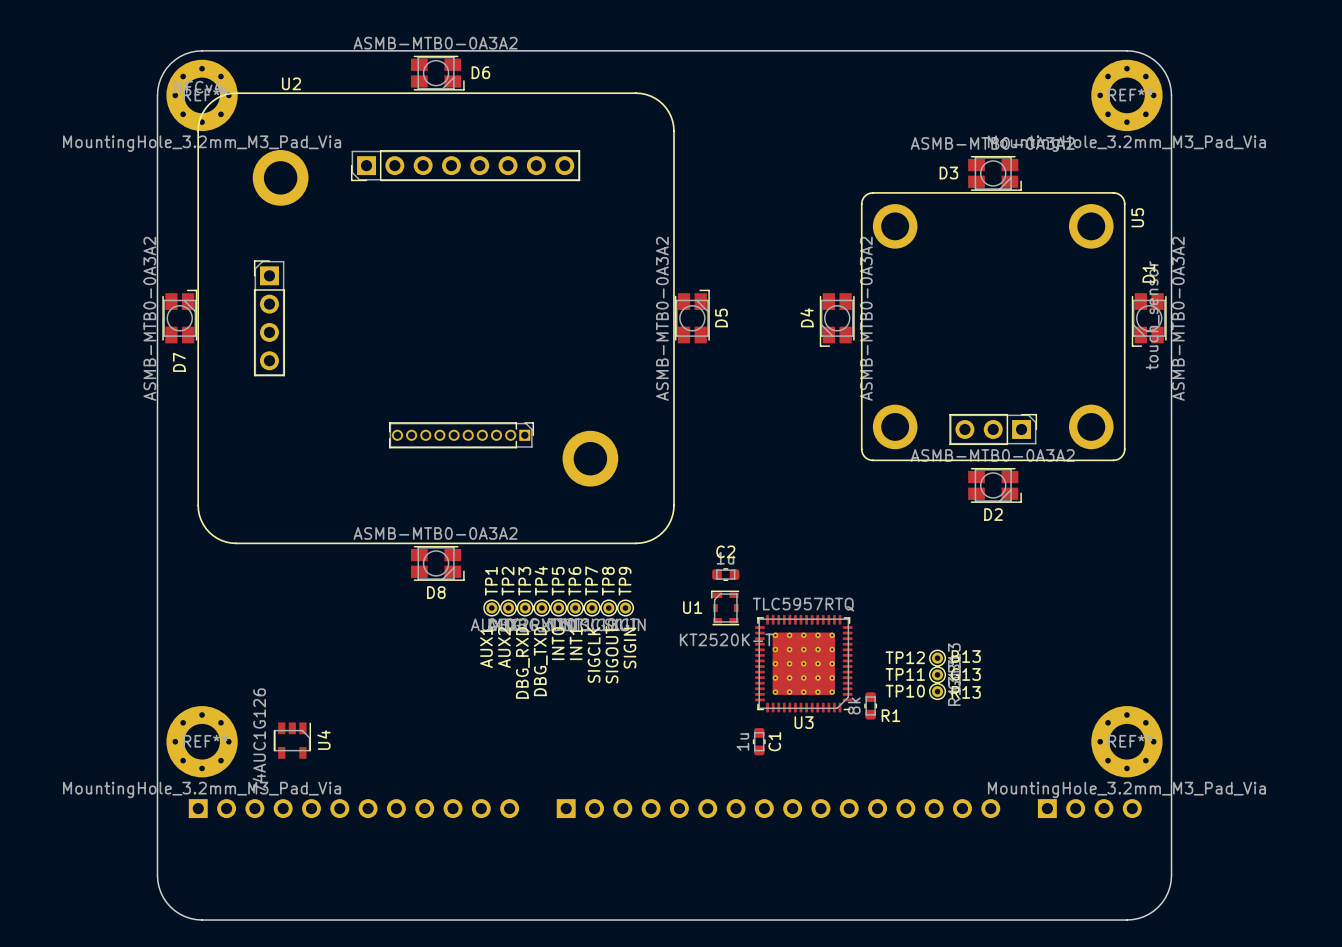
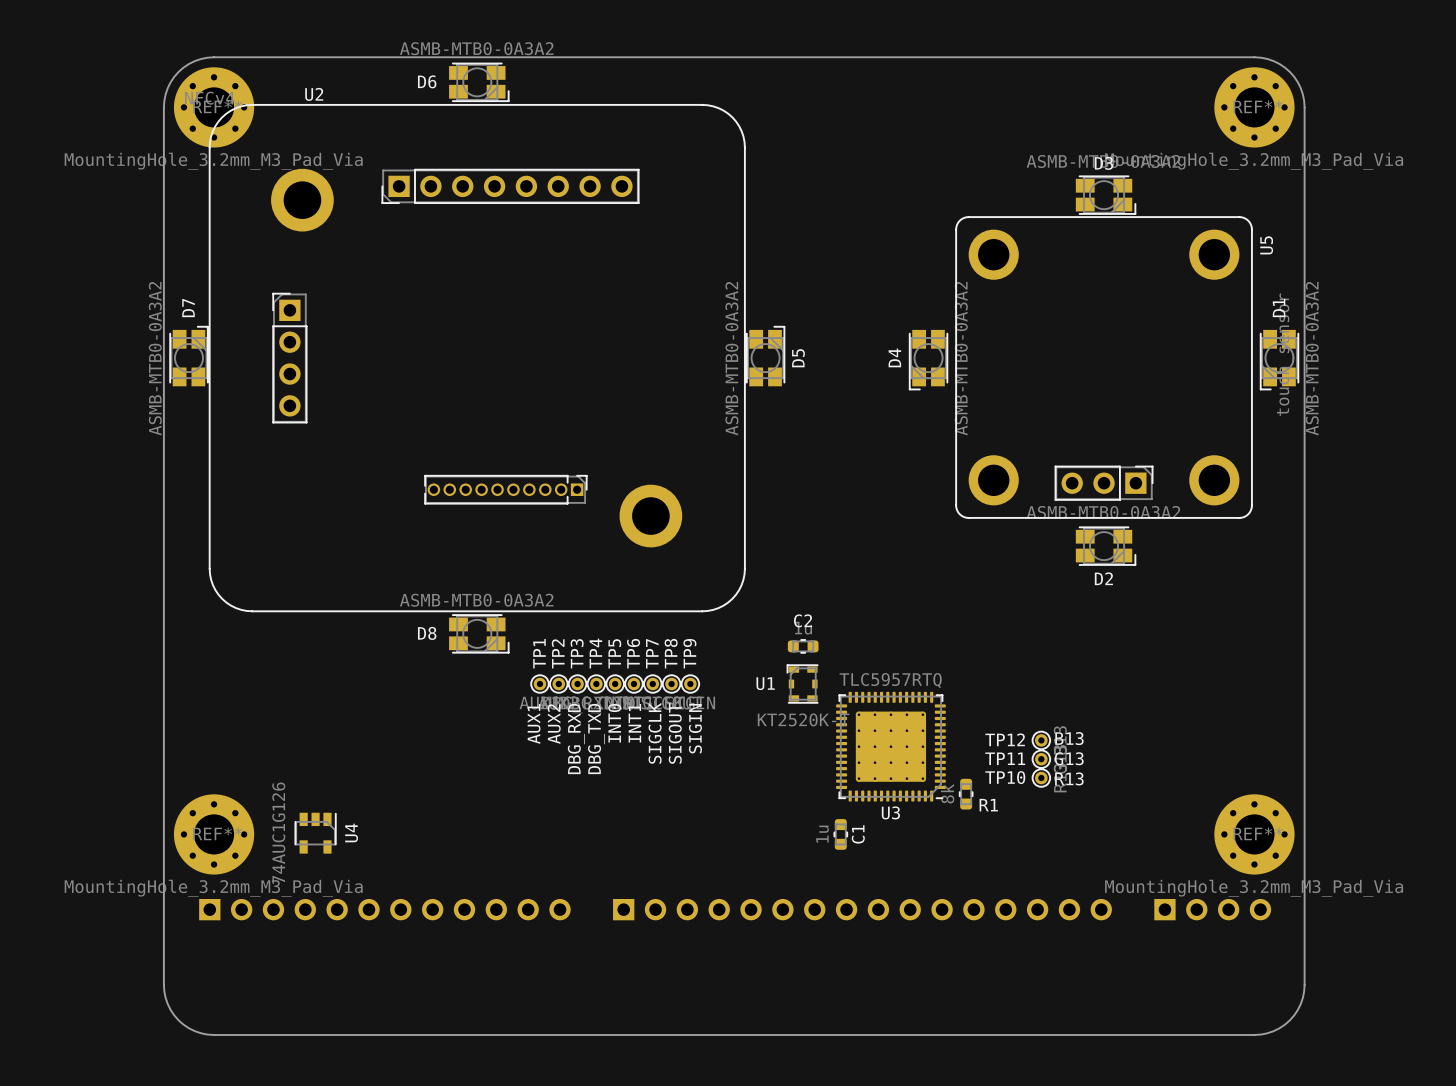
D6 name position: D6 (480, 72) -> D6 (427, 81)
D3 name position: D3 (948, 173) -> D3 (1103, 163)
D7 name position: D7 (179, 362) -> D7 (188, 308)
D8 name position: D8 (436, 592) -> D8 (427, 633)

